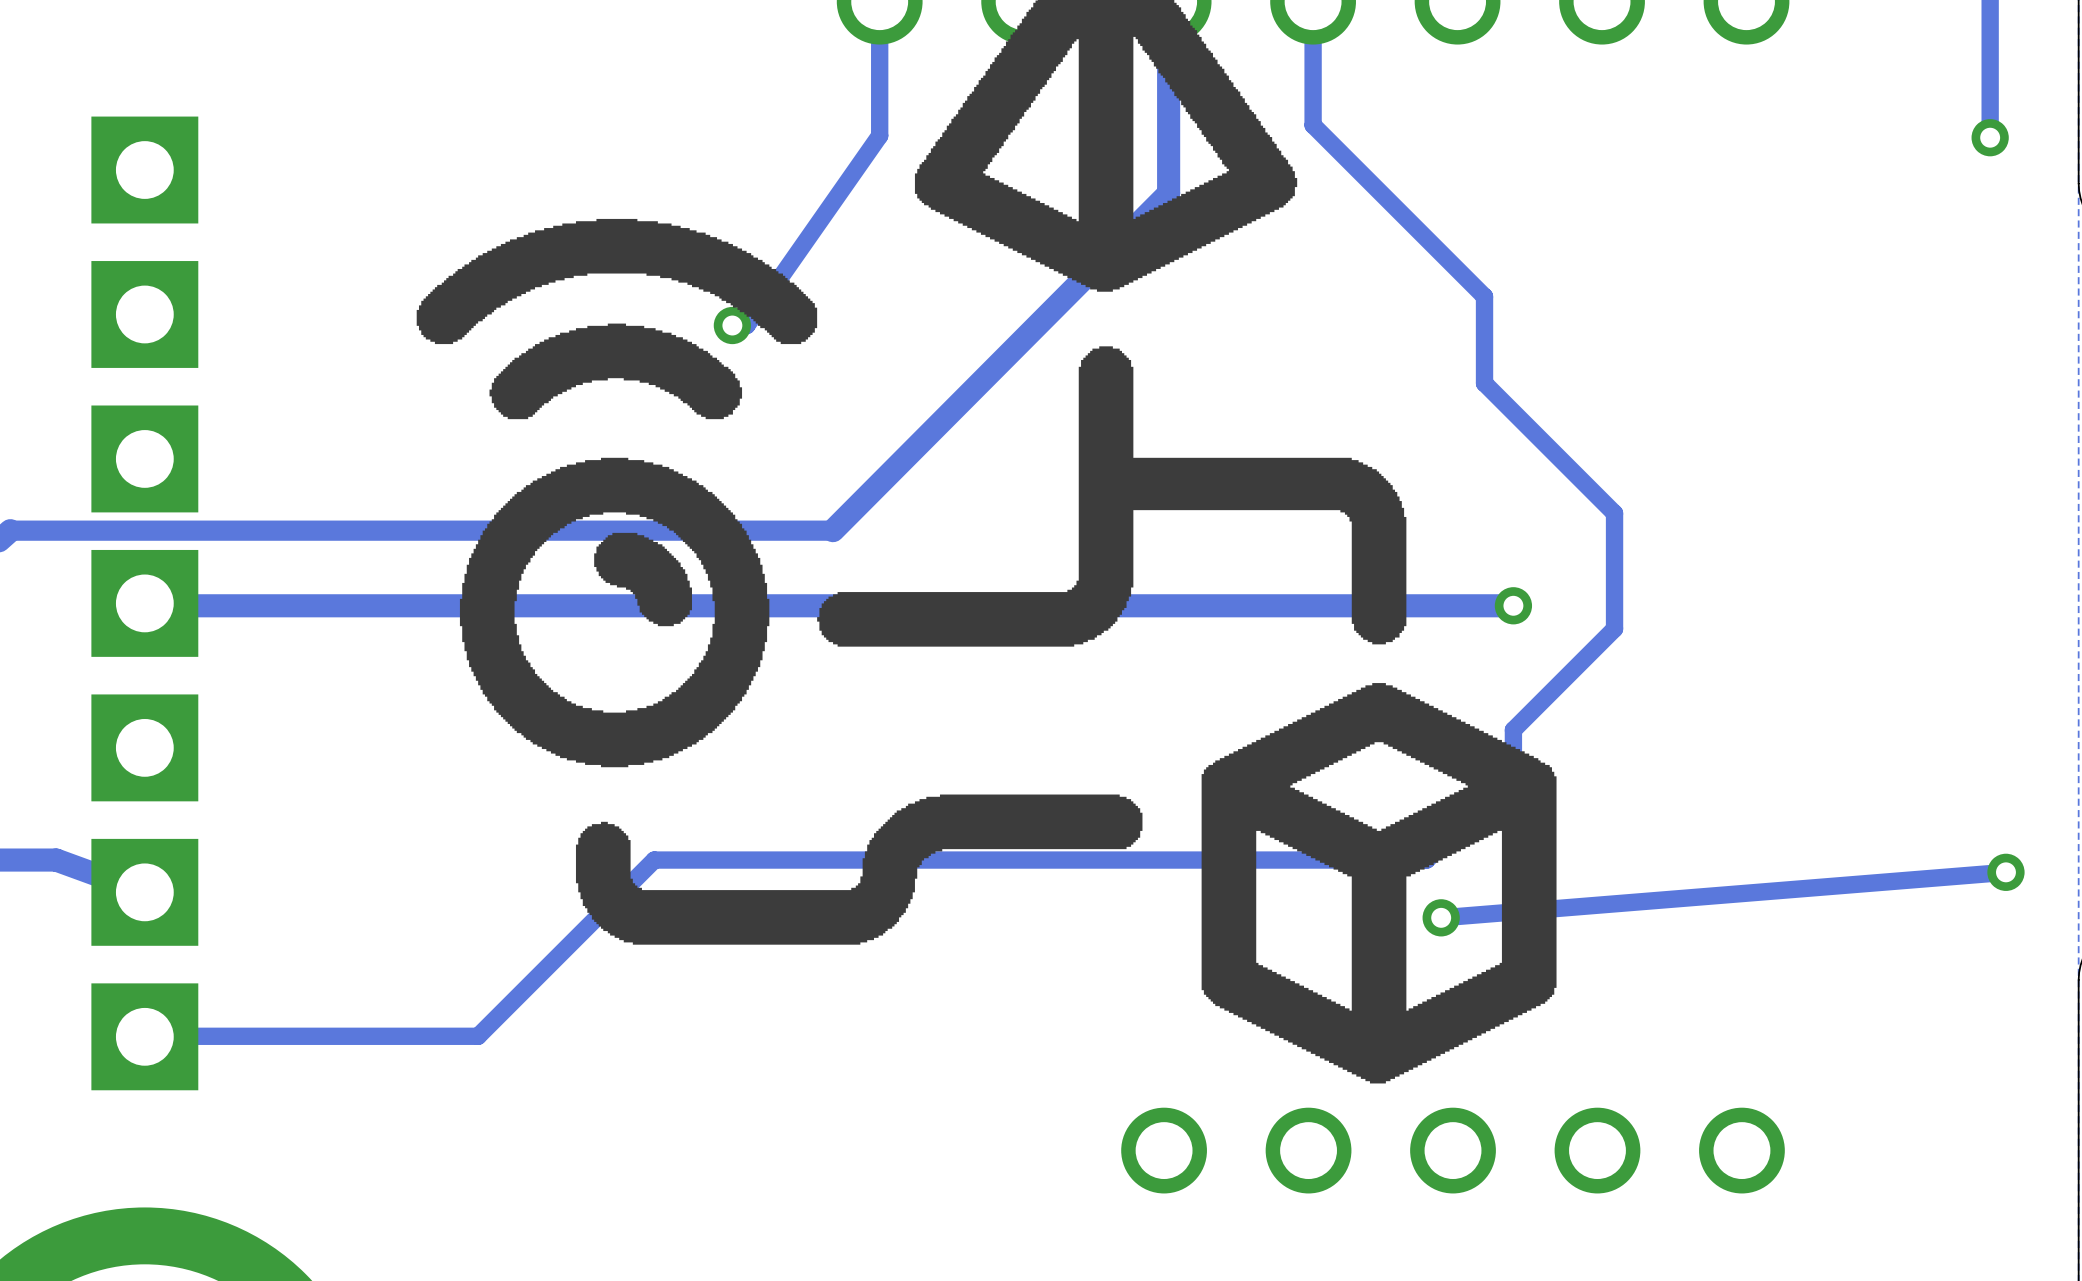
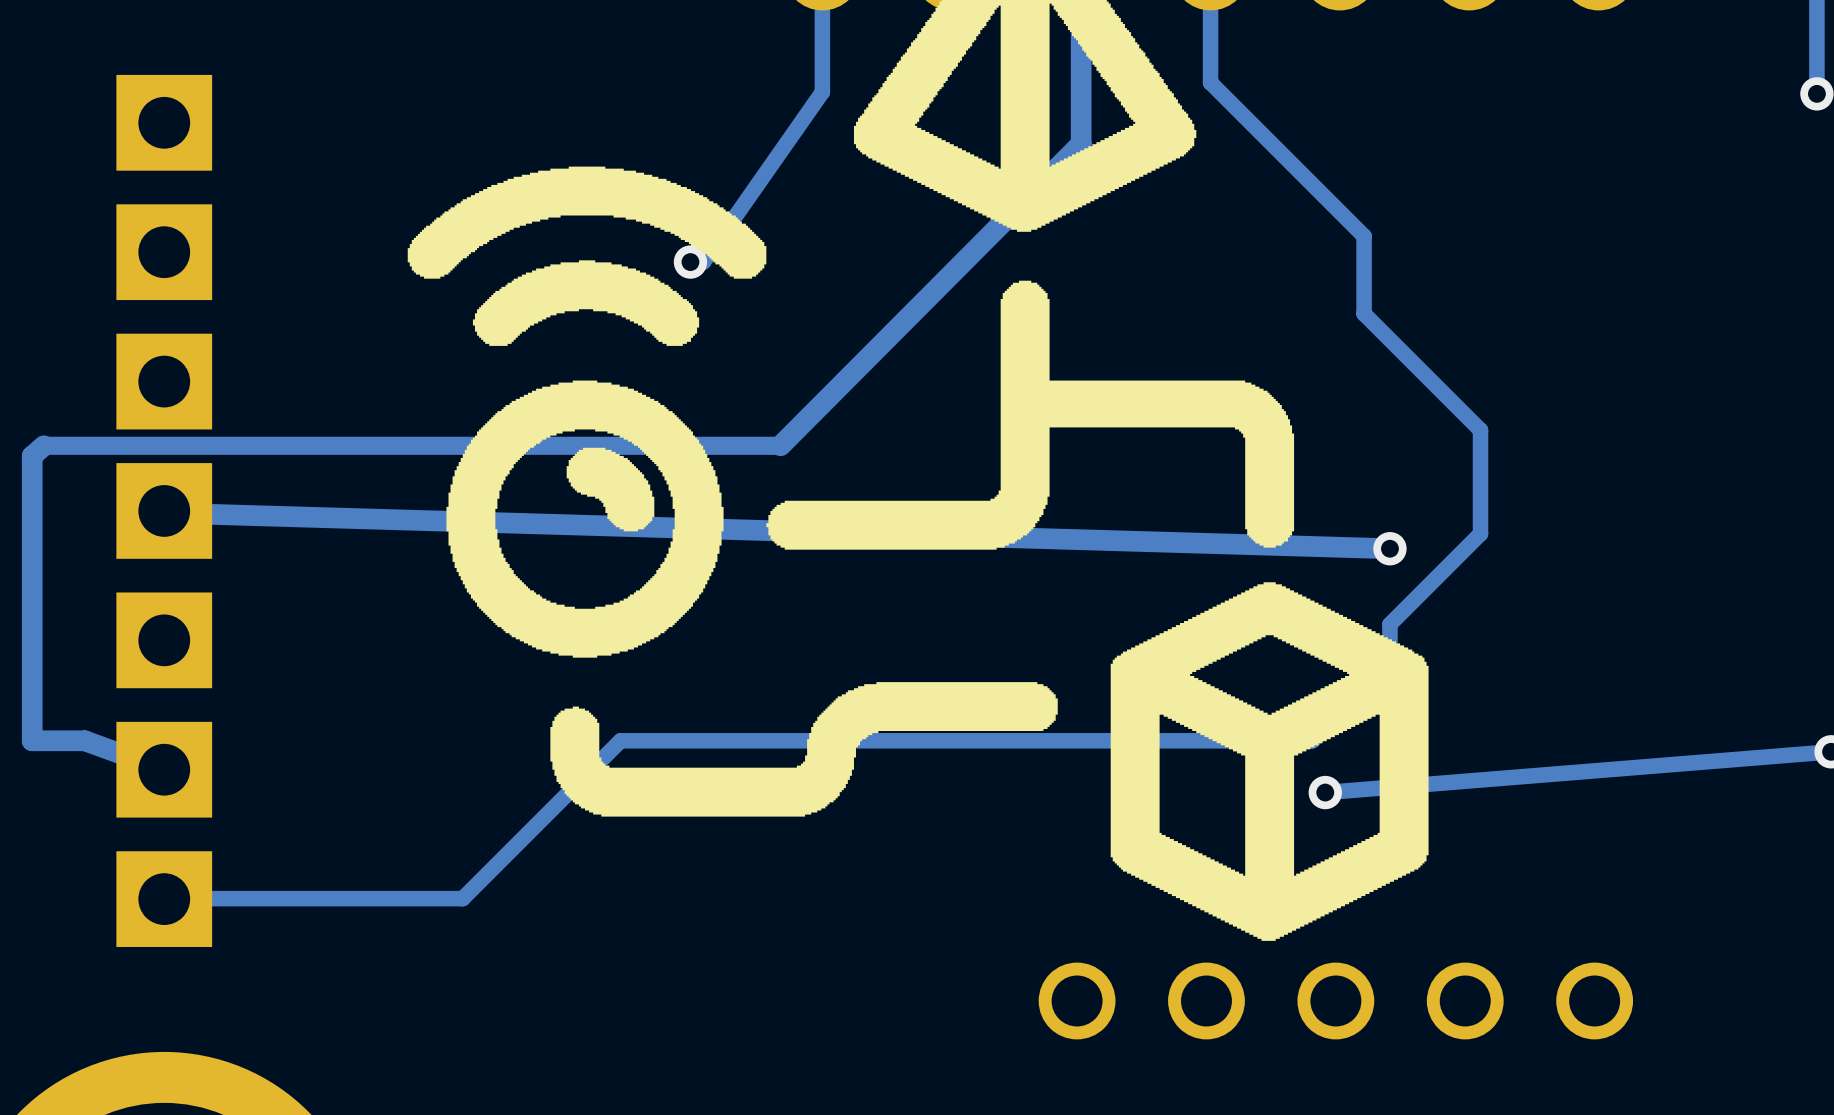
track: (1513, 605) (147, 605) -> (1389, 548) (166, 513)
via position: (1513, 605) -> (1389, 548)

